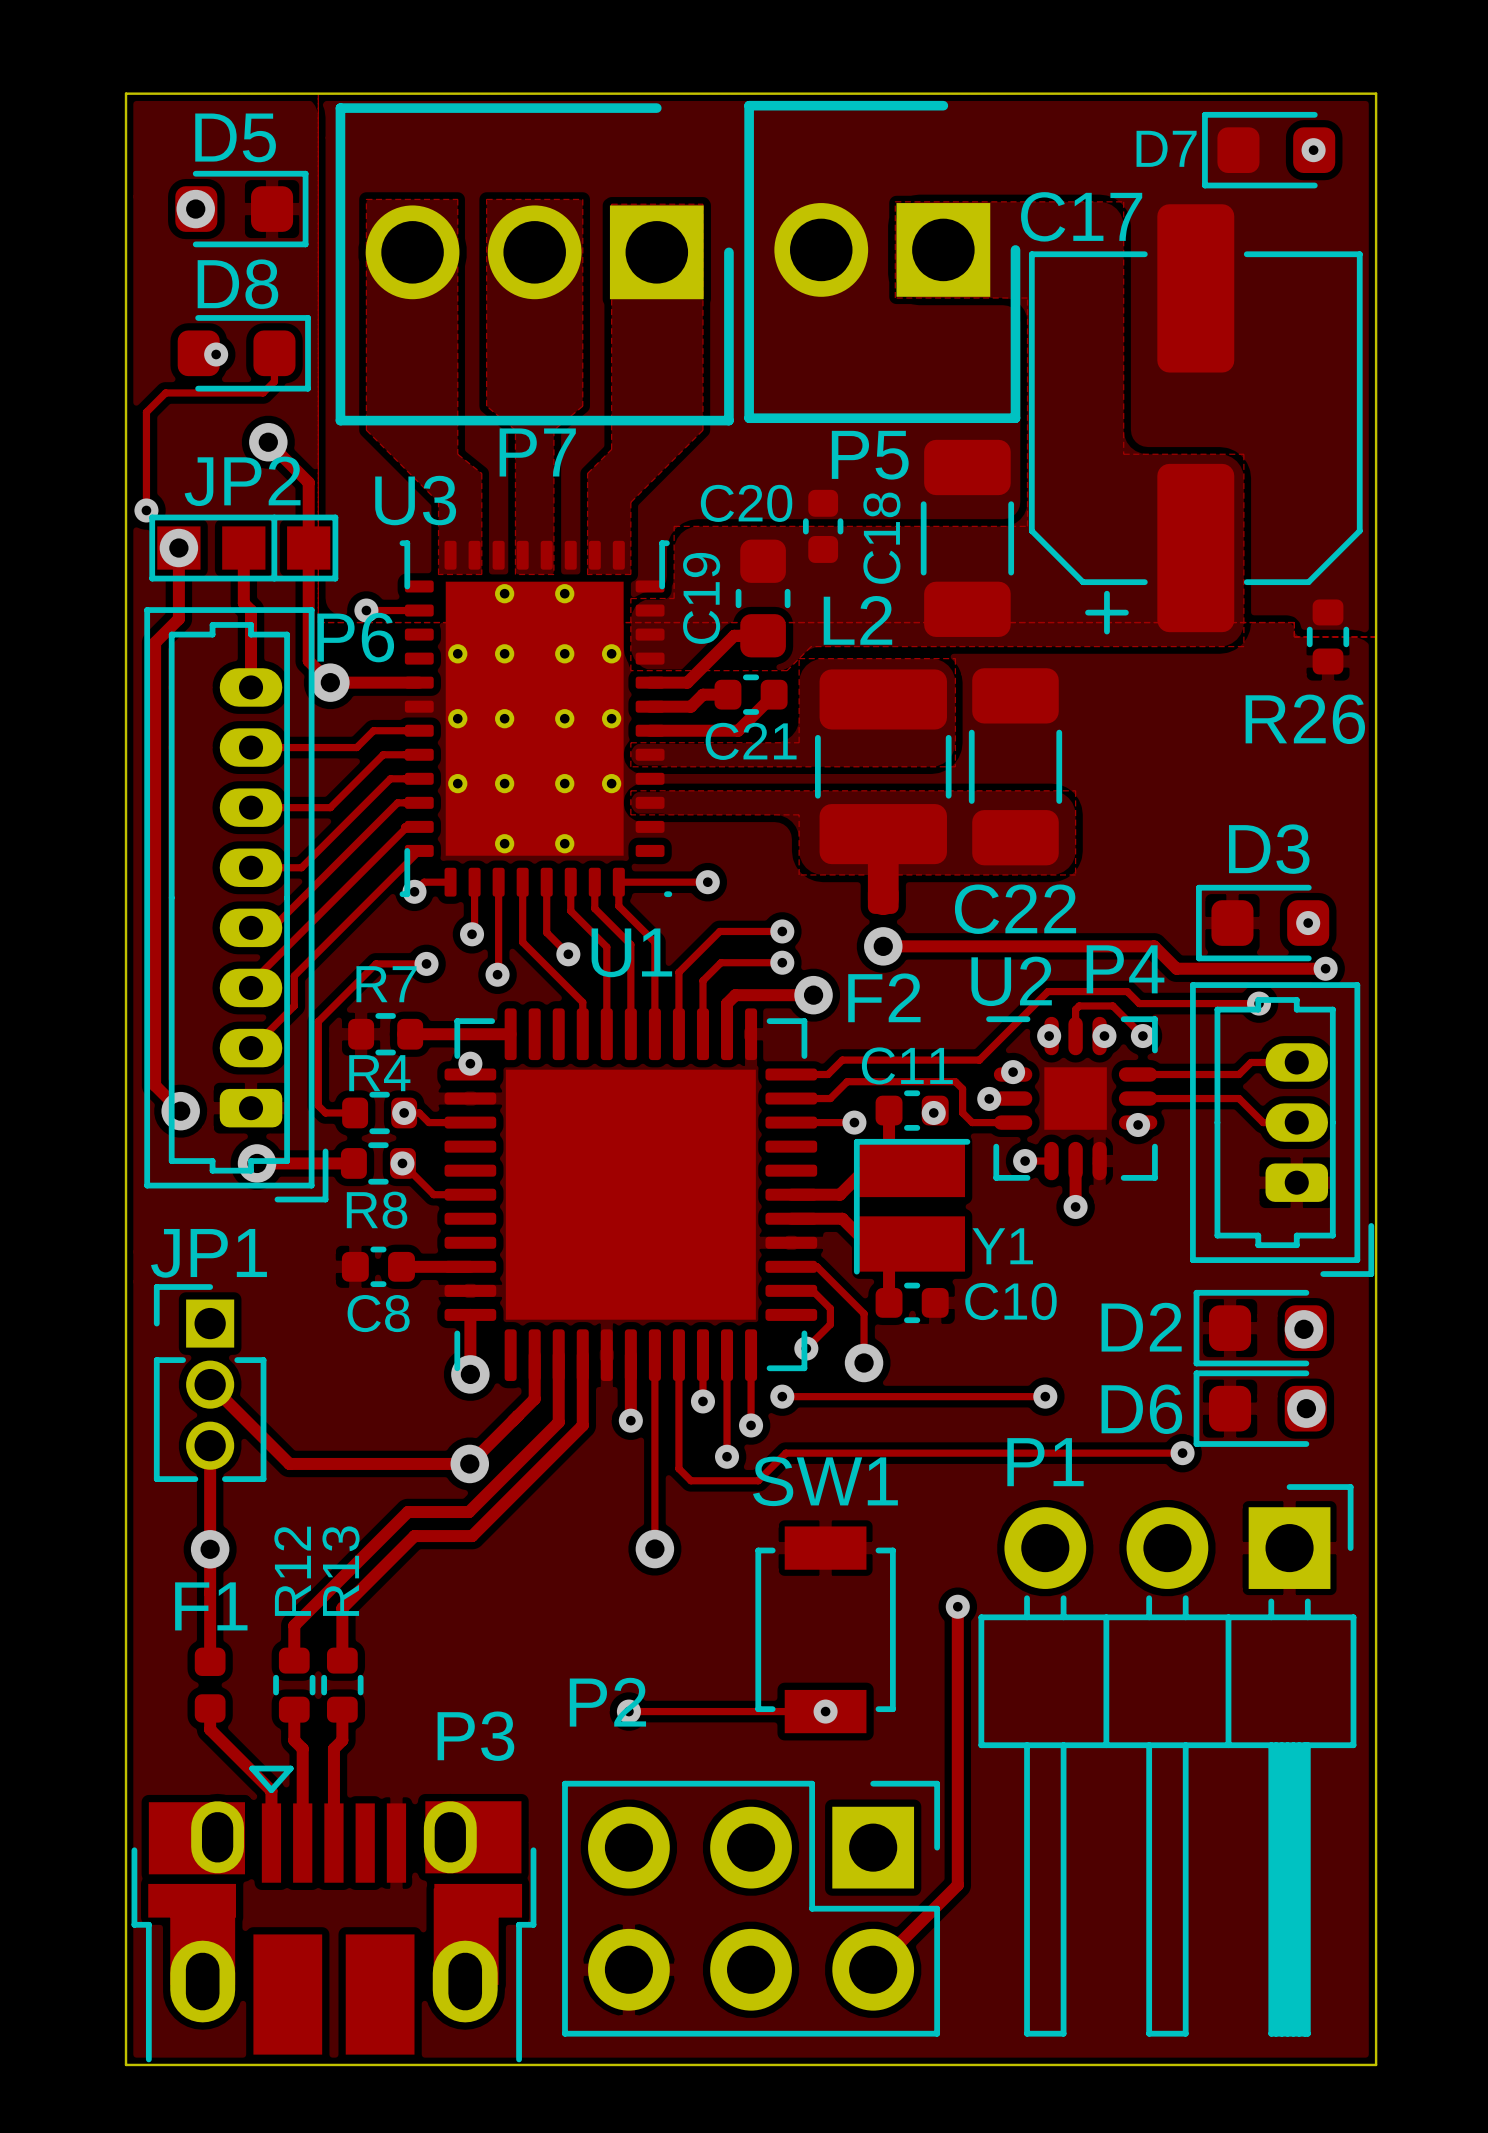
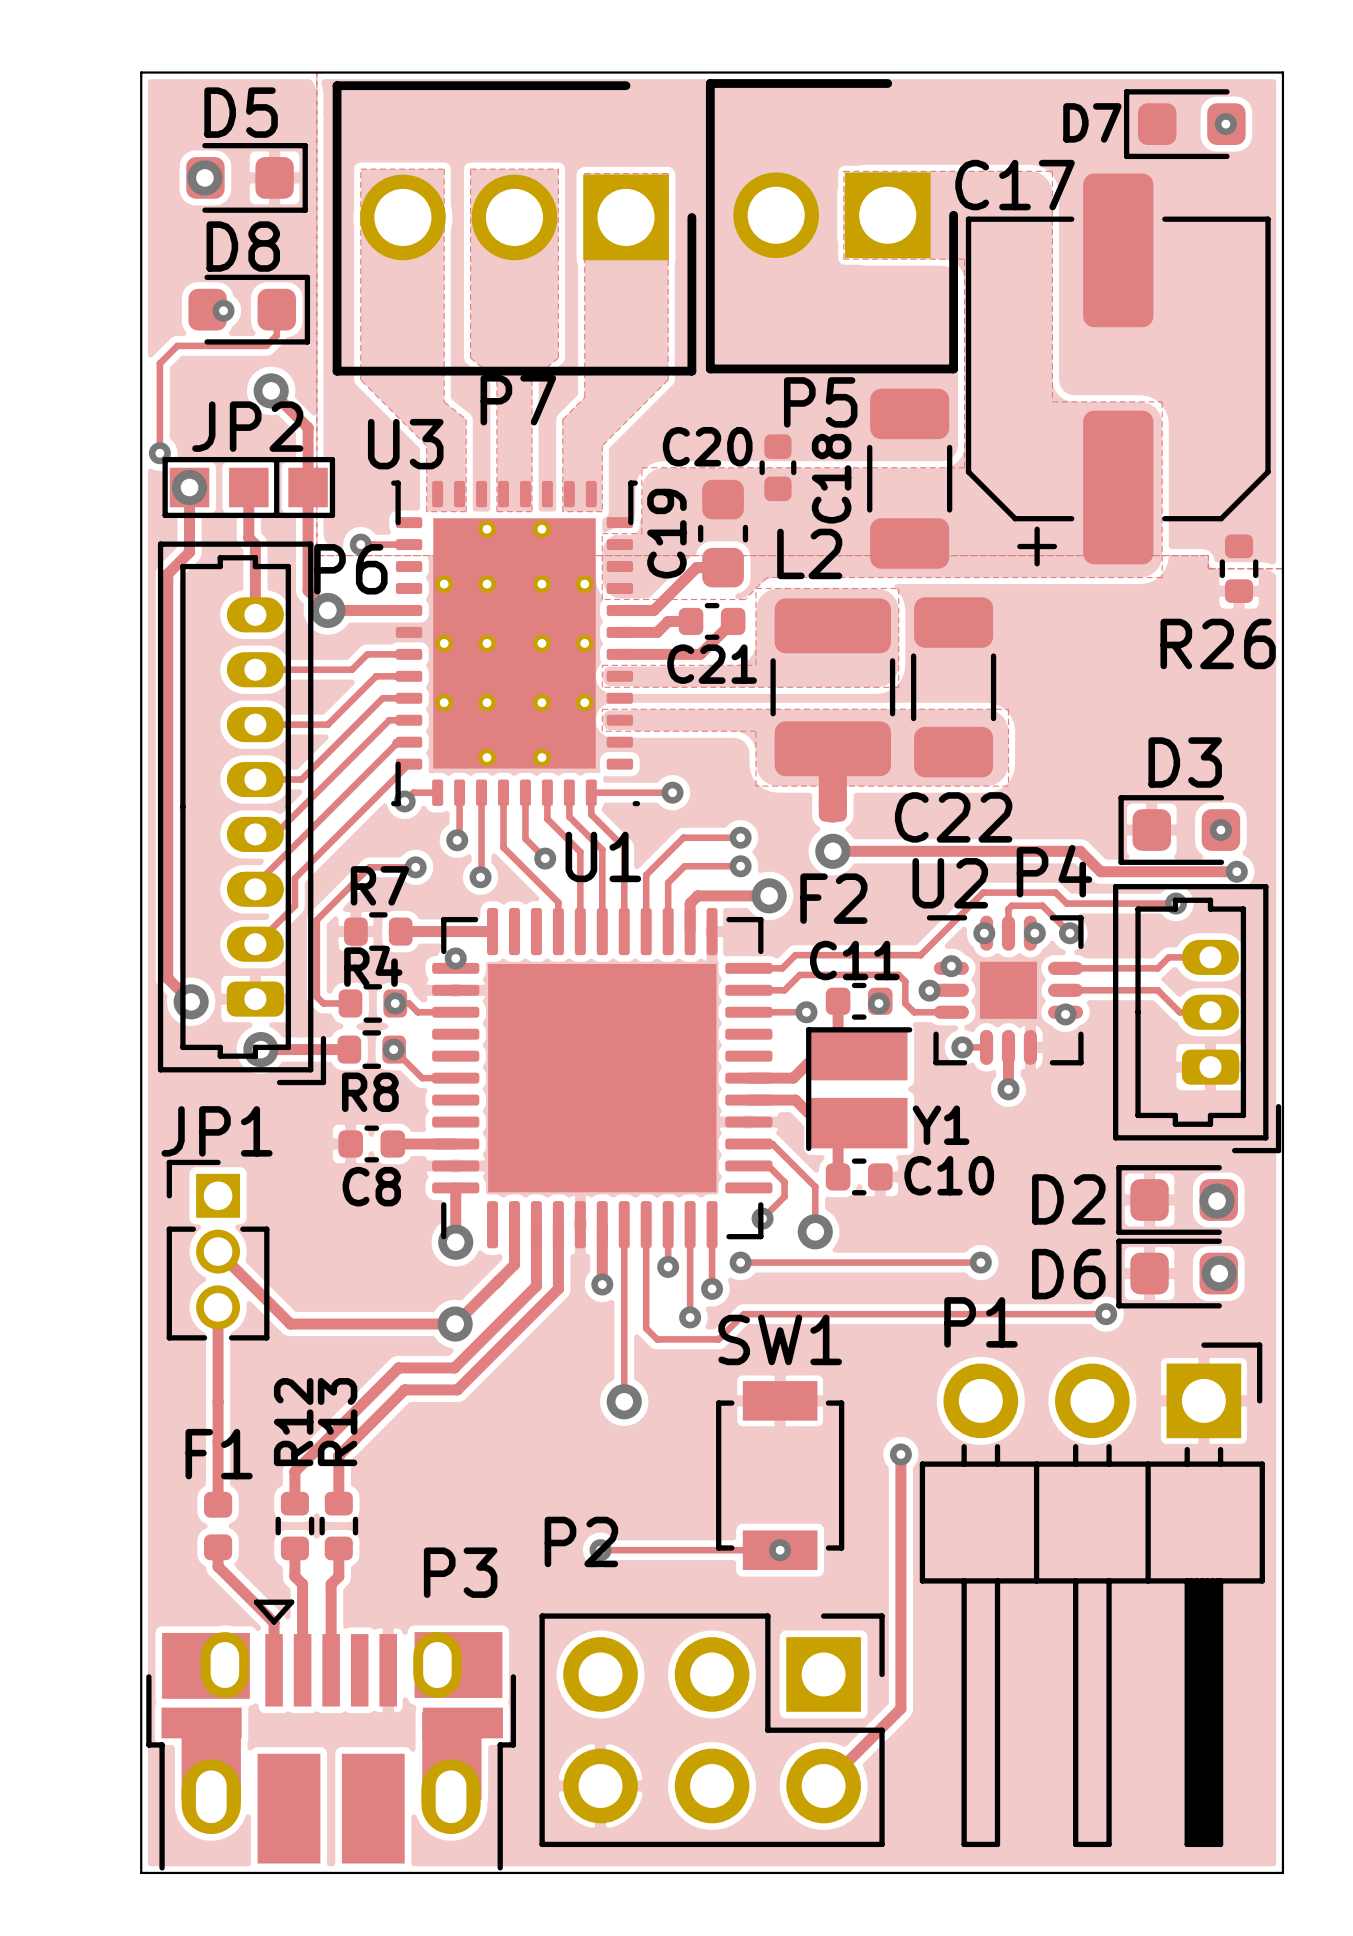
via: (210, 1549) -> none

